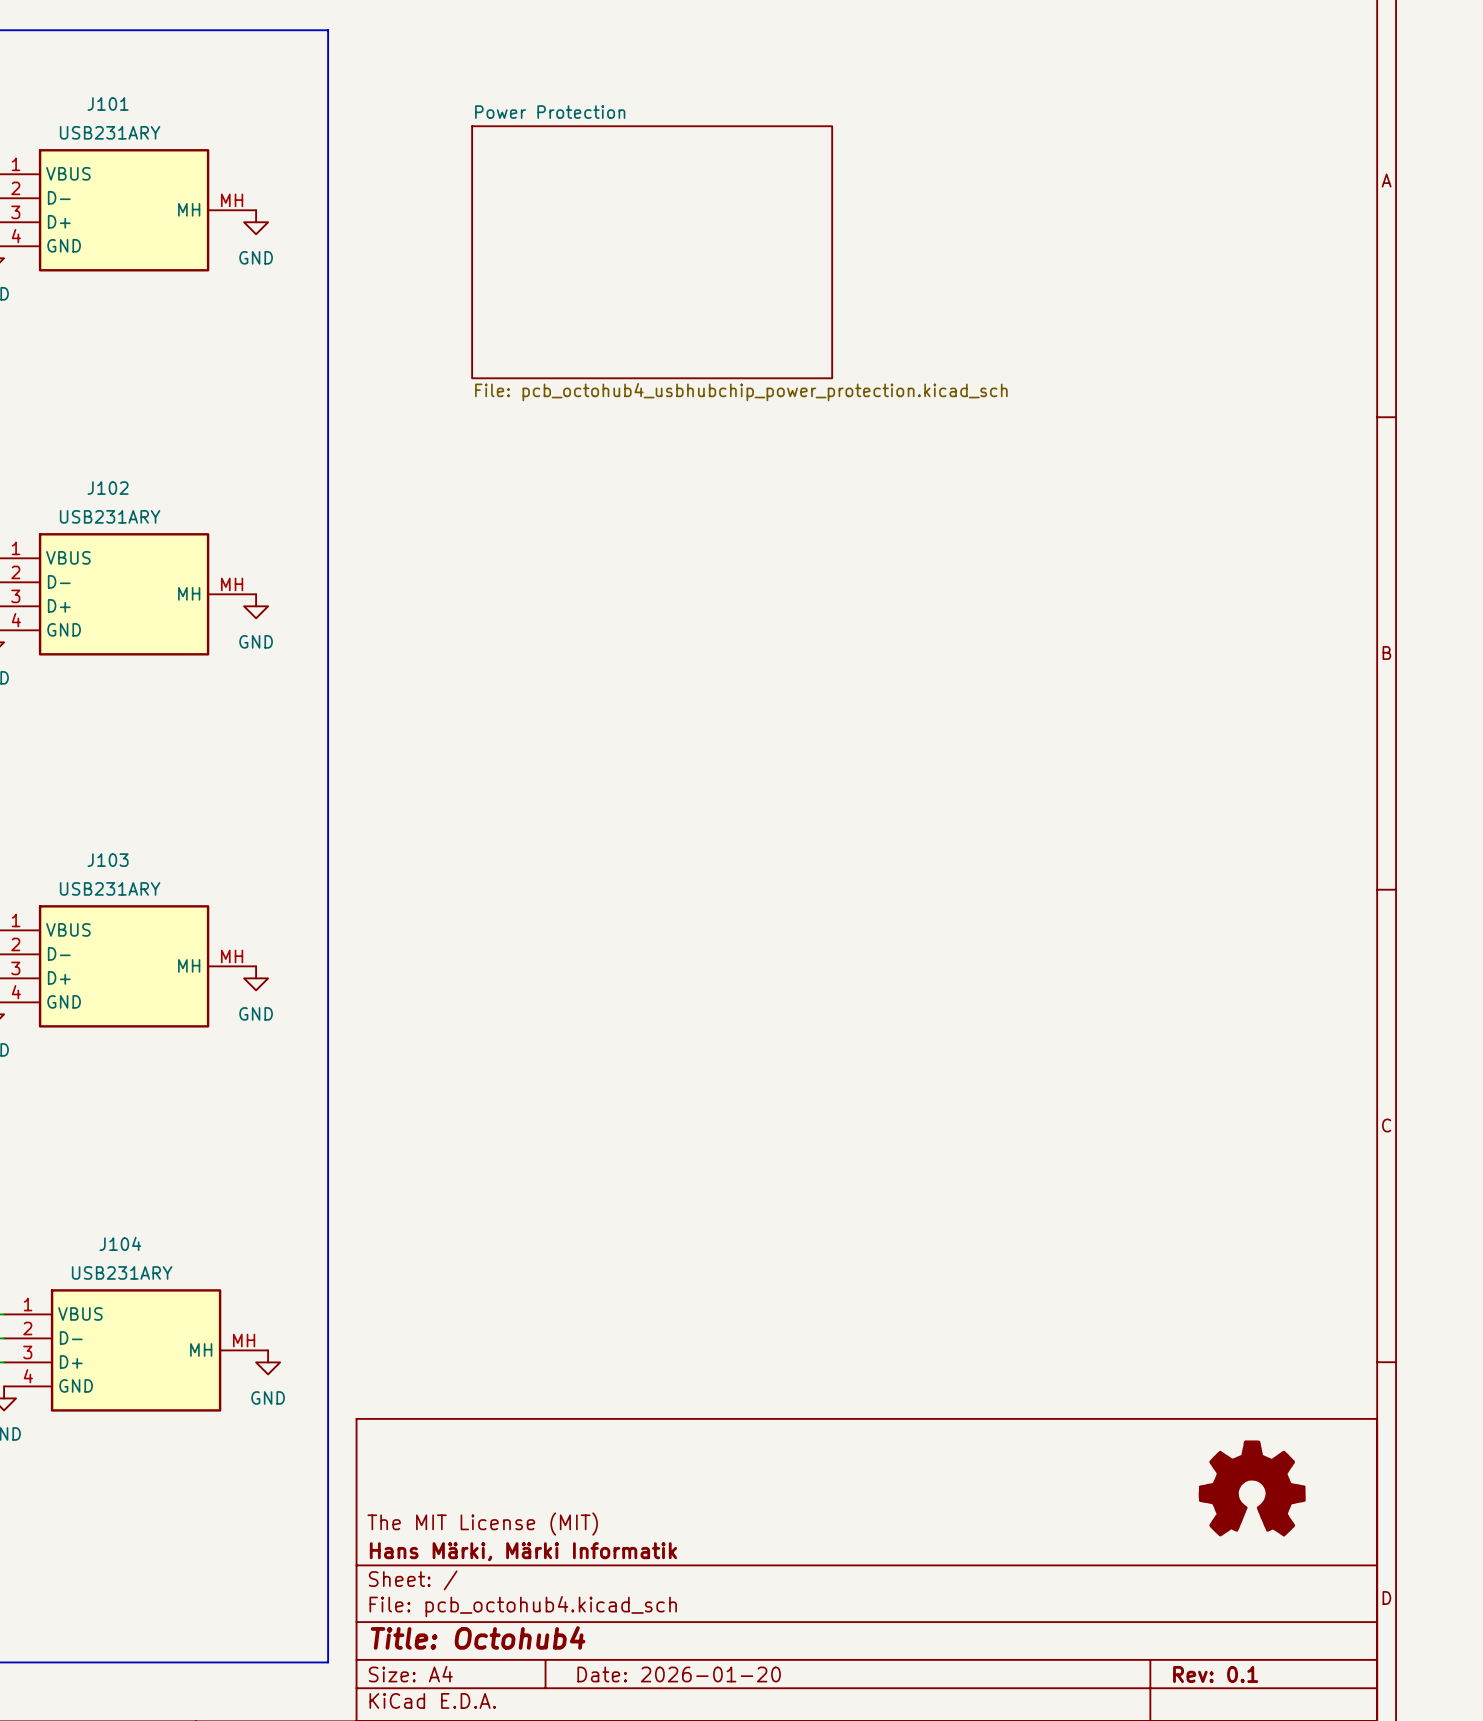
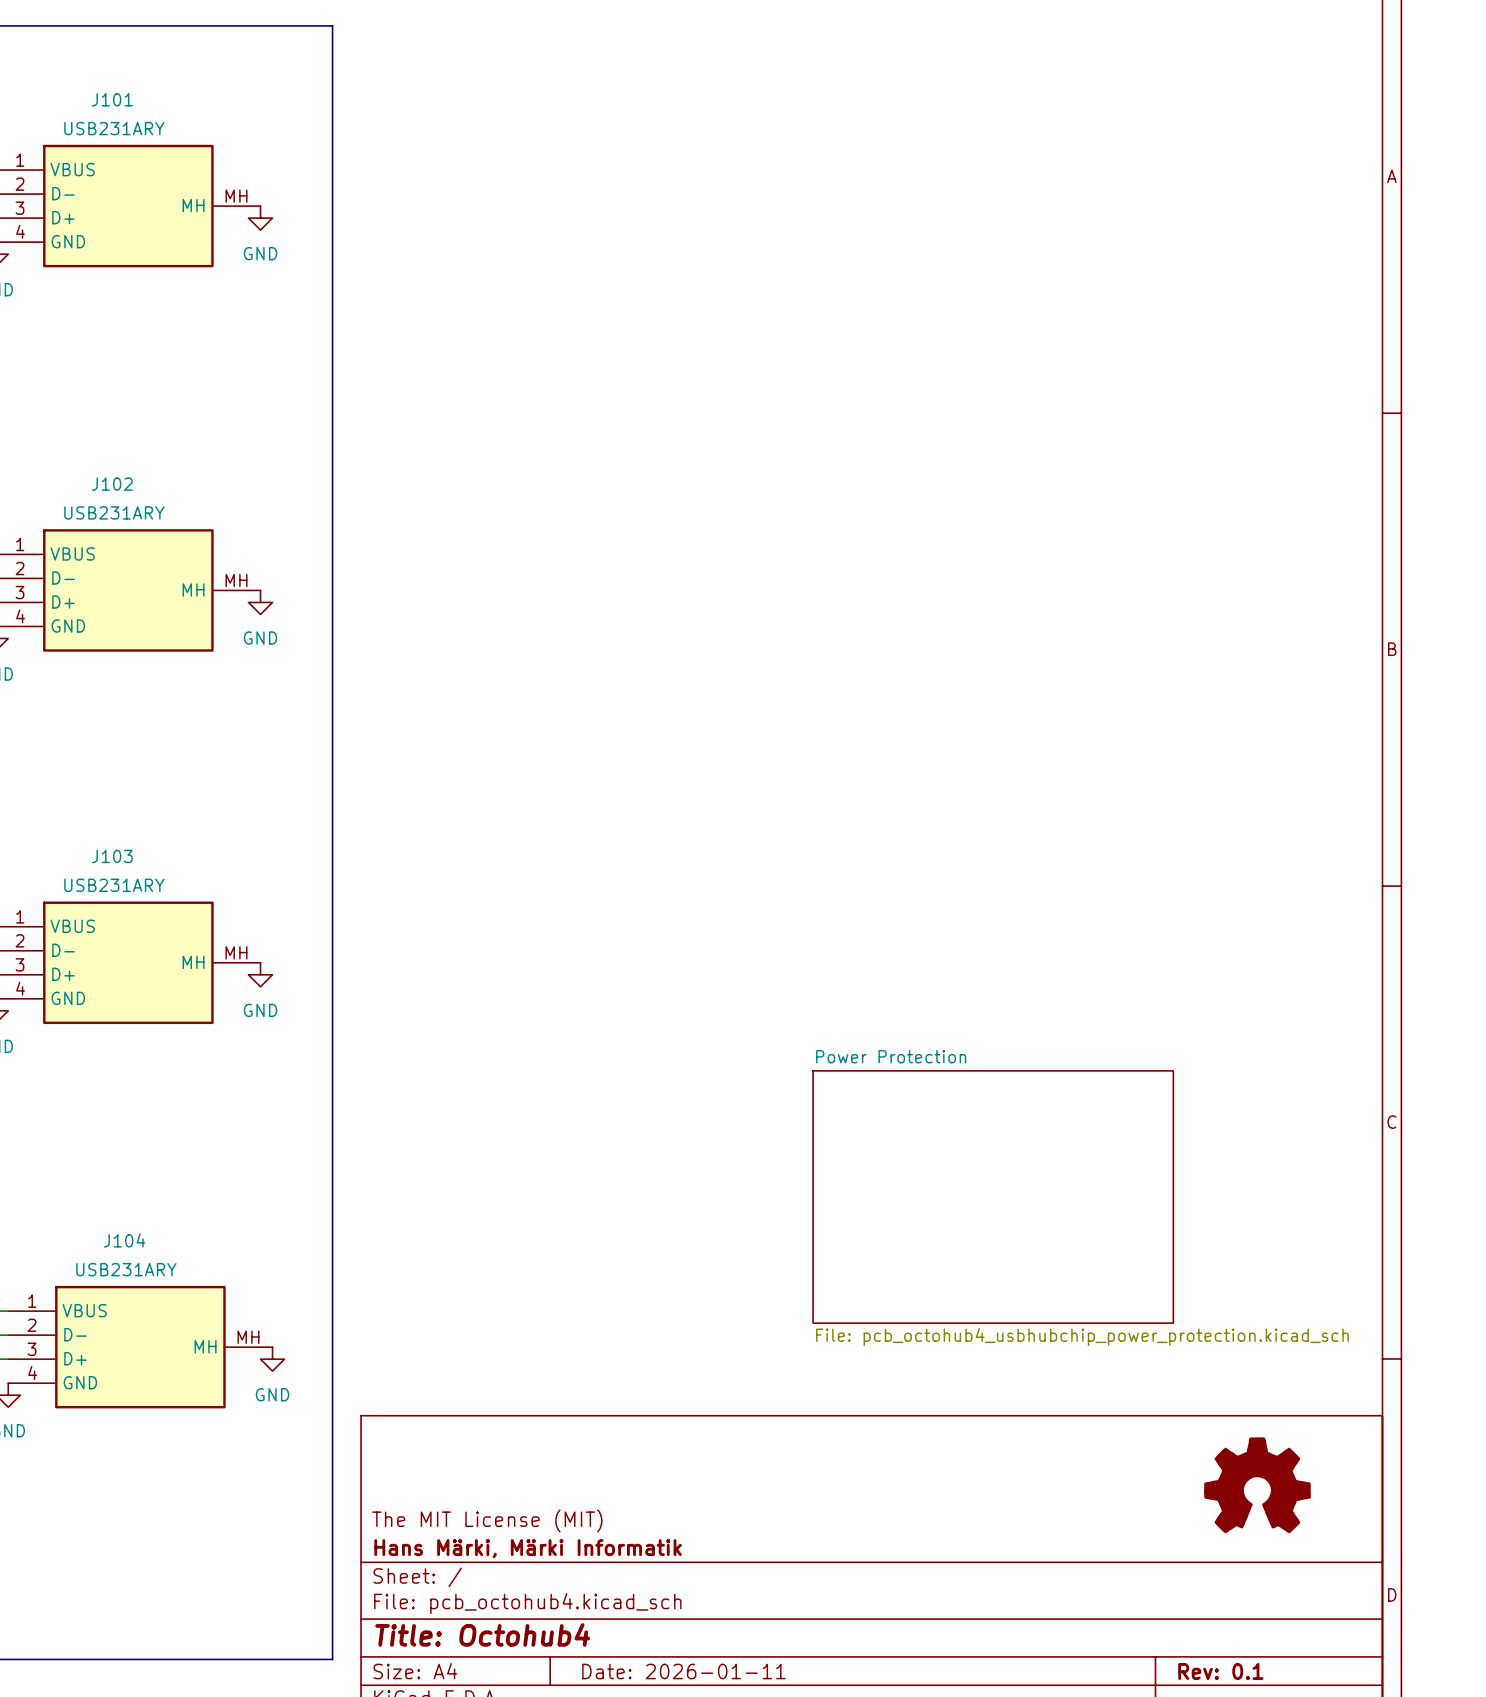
sheet Power Protection: File: pcb_octohub4_usbhubchip_power_protection.kicad_sch (652, 252) -> none
sheet Power Protection: none -> File: pcb_octohub4_usbhubchip_power_protection.kicad_sch (993, 1197)
title block: Date: 2026-01-20 (679, 1674) -> Date: 2026-01-11 (683, 1671)

